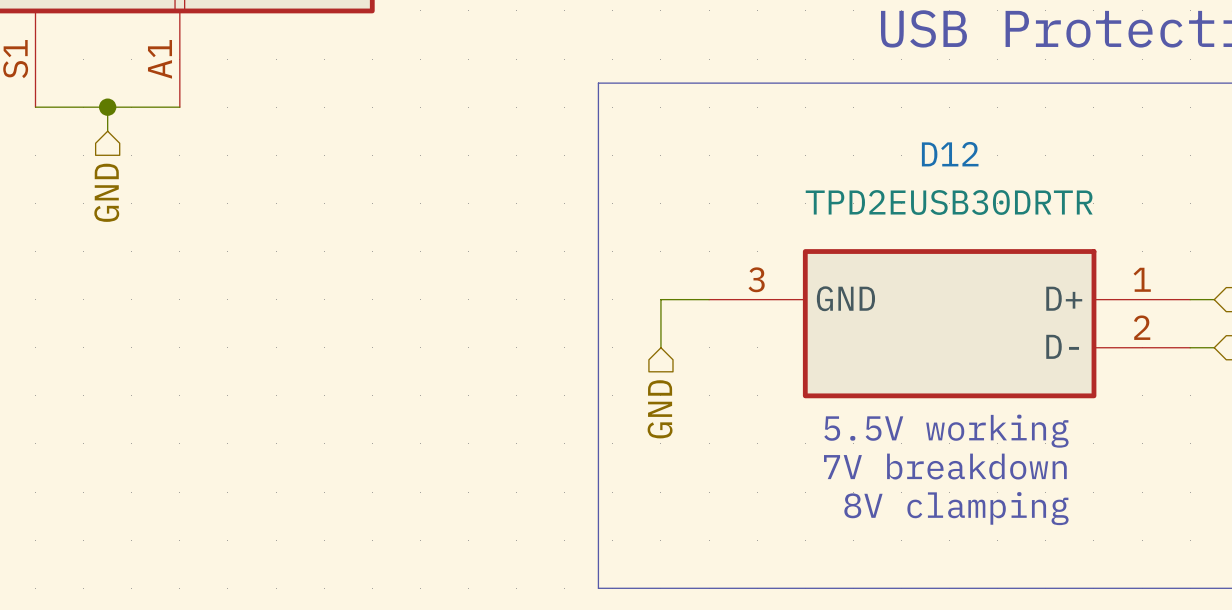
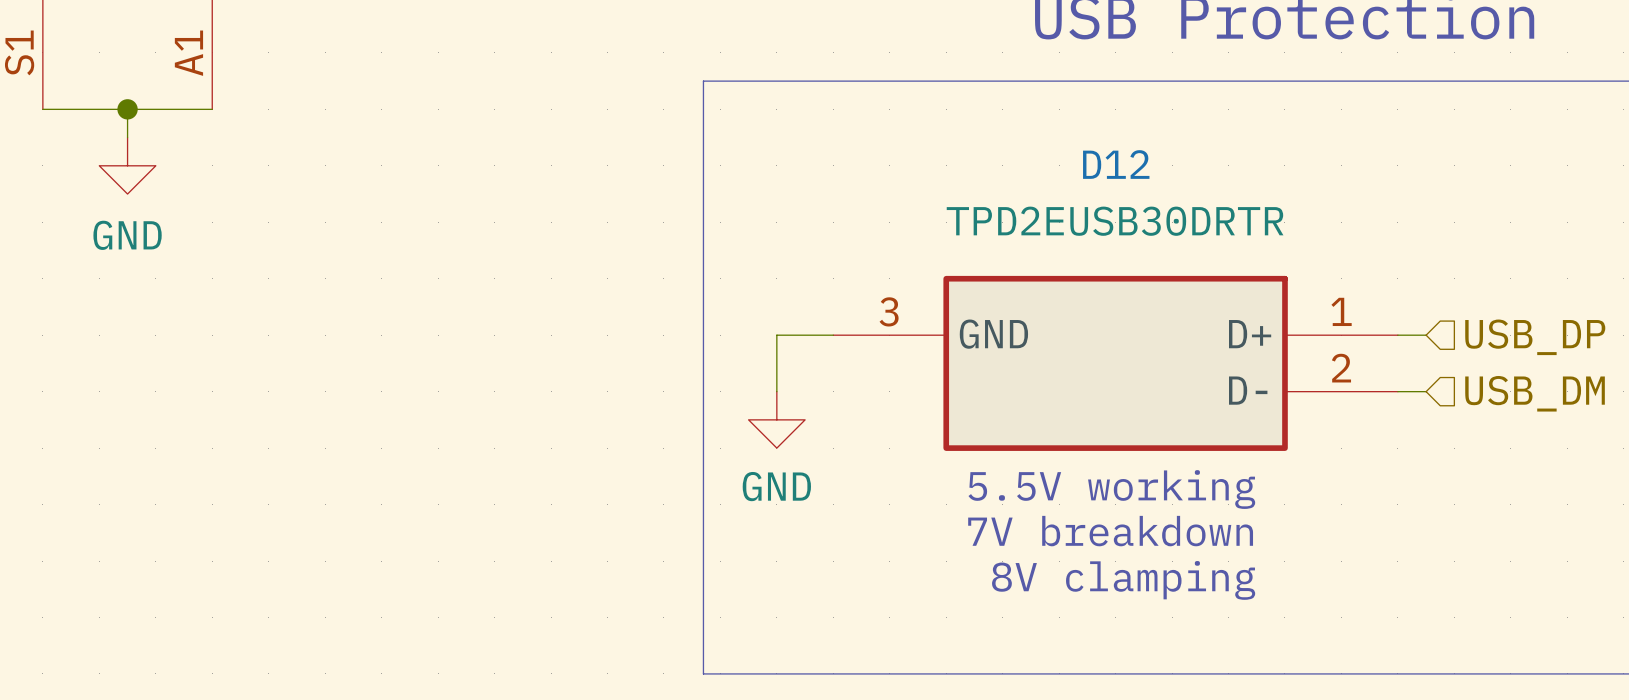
power symbol: none -> GND (127, 165)
hierarchical label: GND (106, 192) -> none
power symbol: none -> GND (776, 419)
hierarchical label: GND (660, 409) -> none

